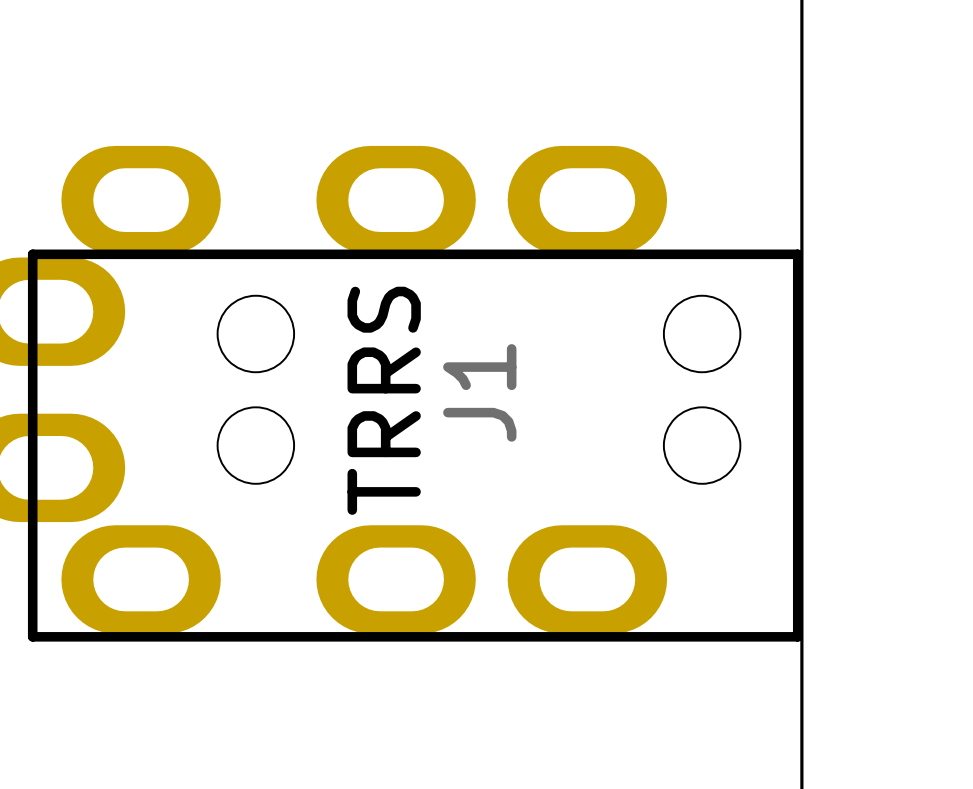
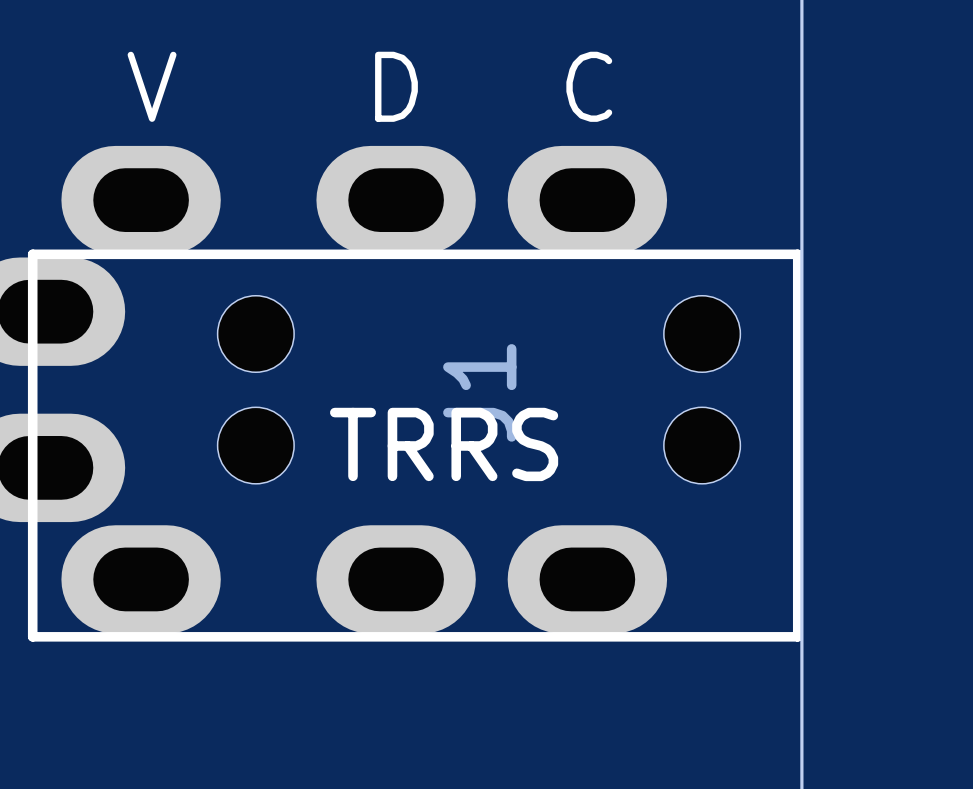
text: none -> V (152, 86)
text: none -> D (396, 86)
text: none -> C (589, 86)
J1 text rotation: 0° (384, 400) -> 90° clockwise (444, 444)

